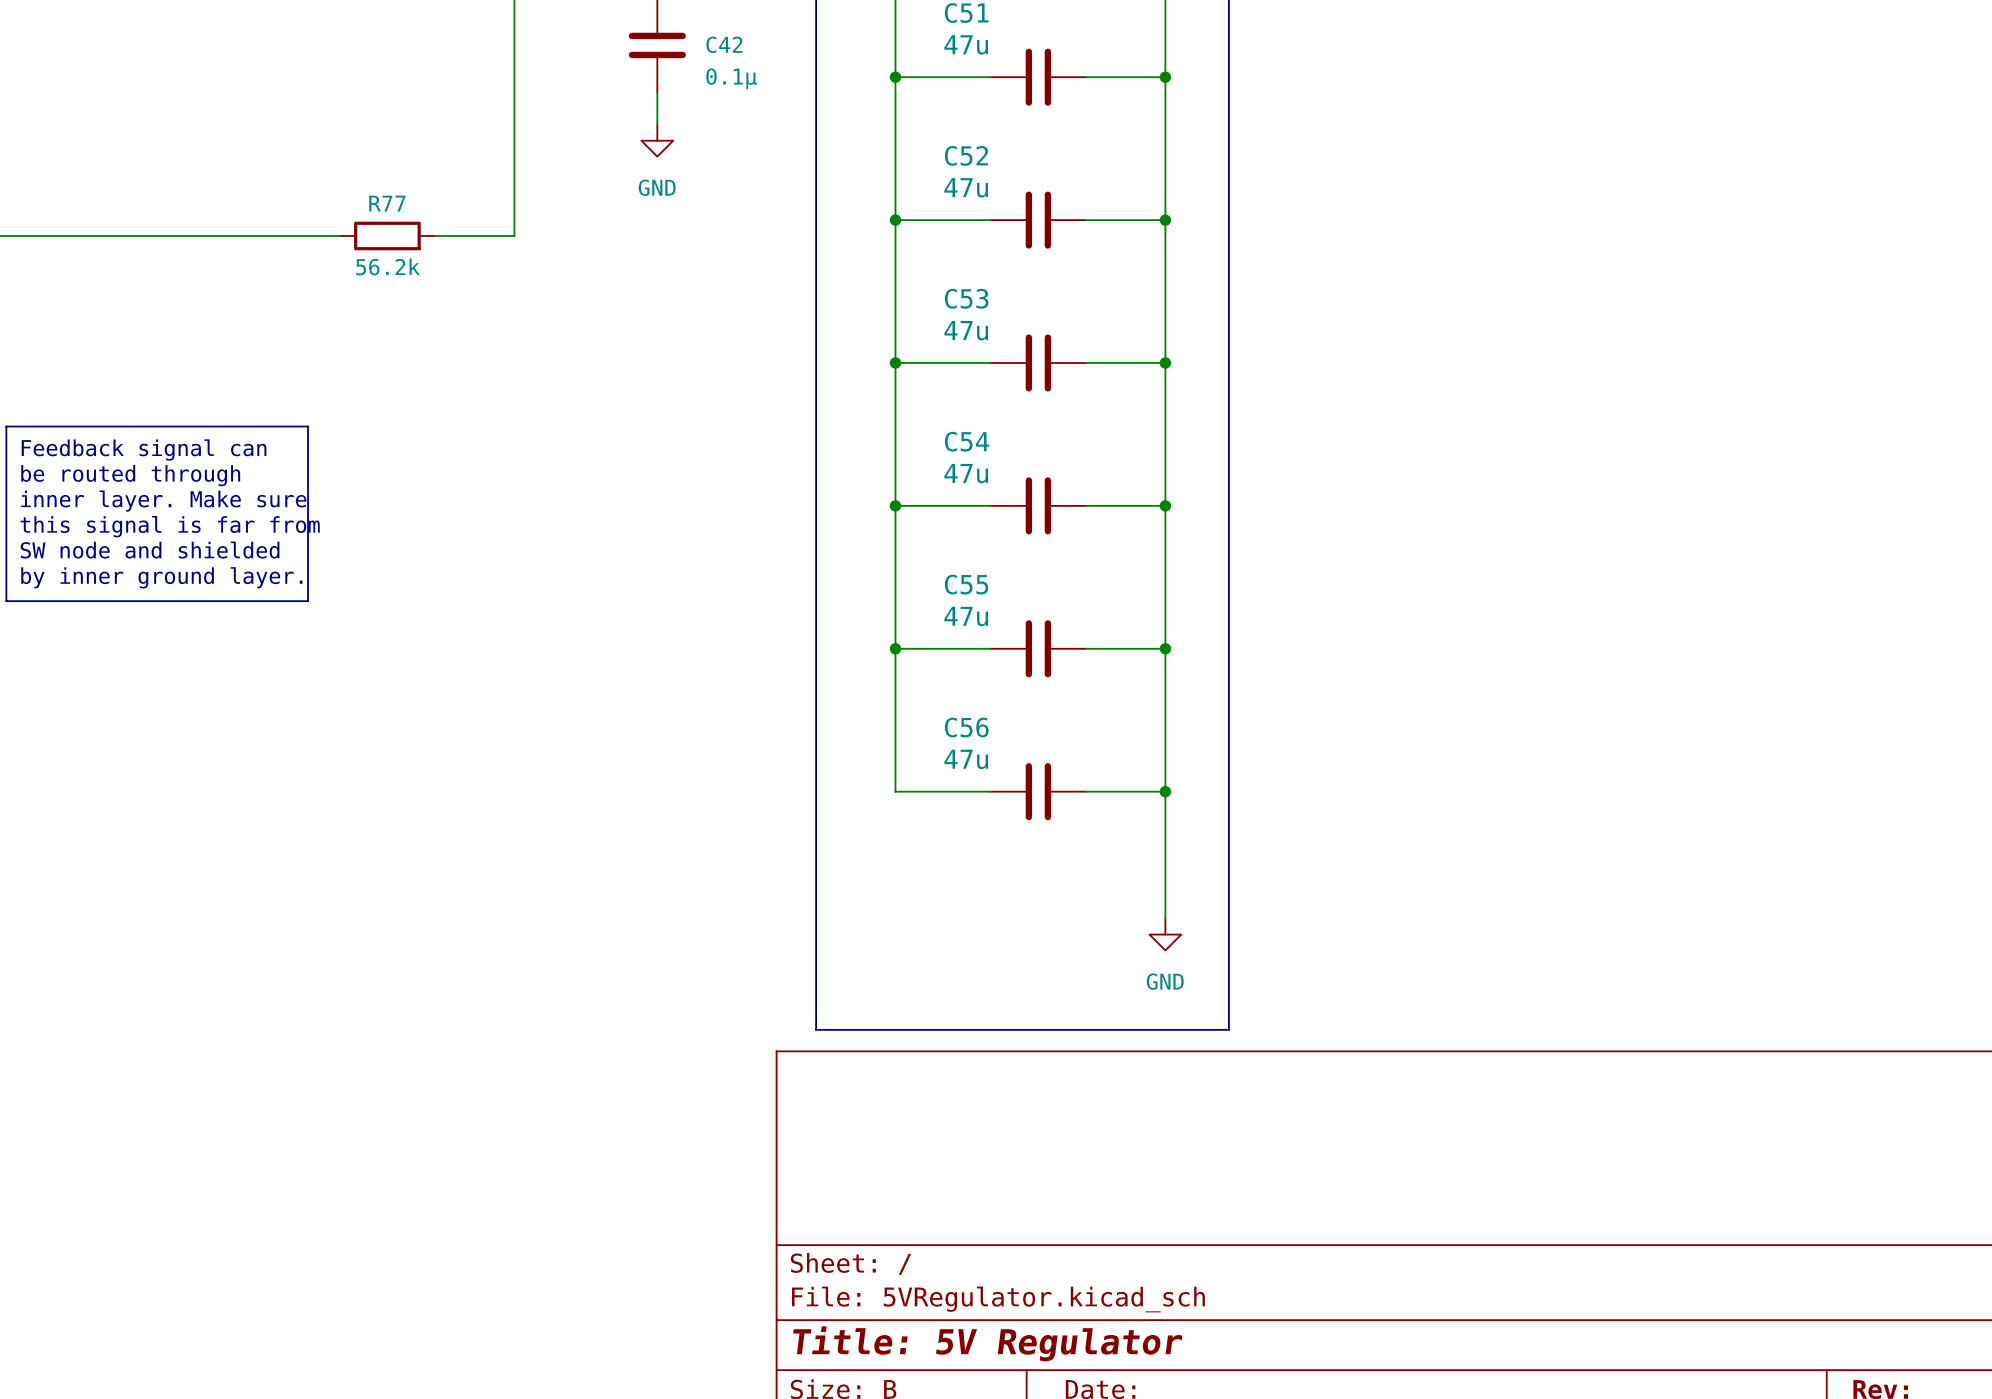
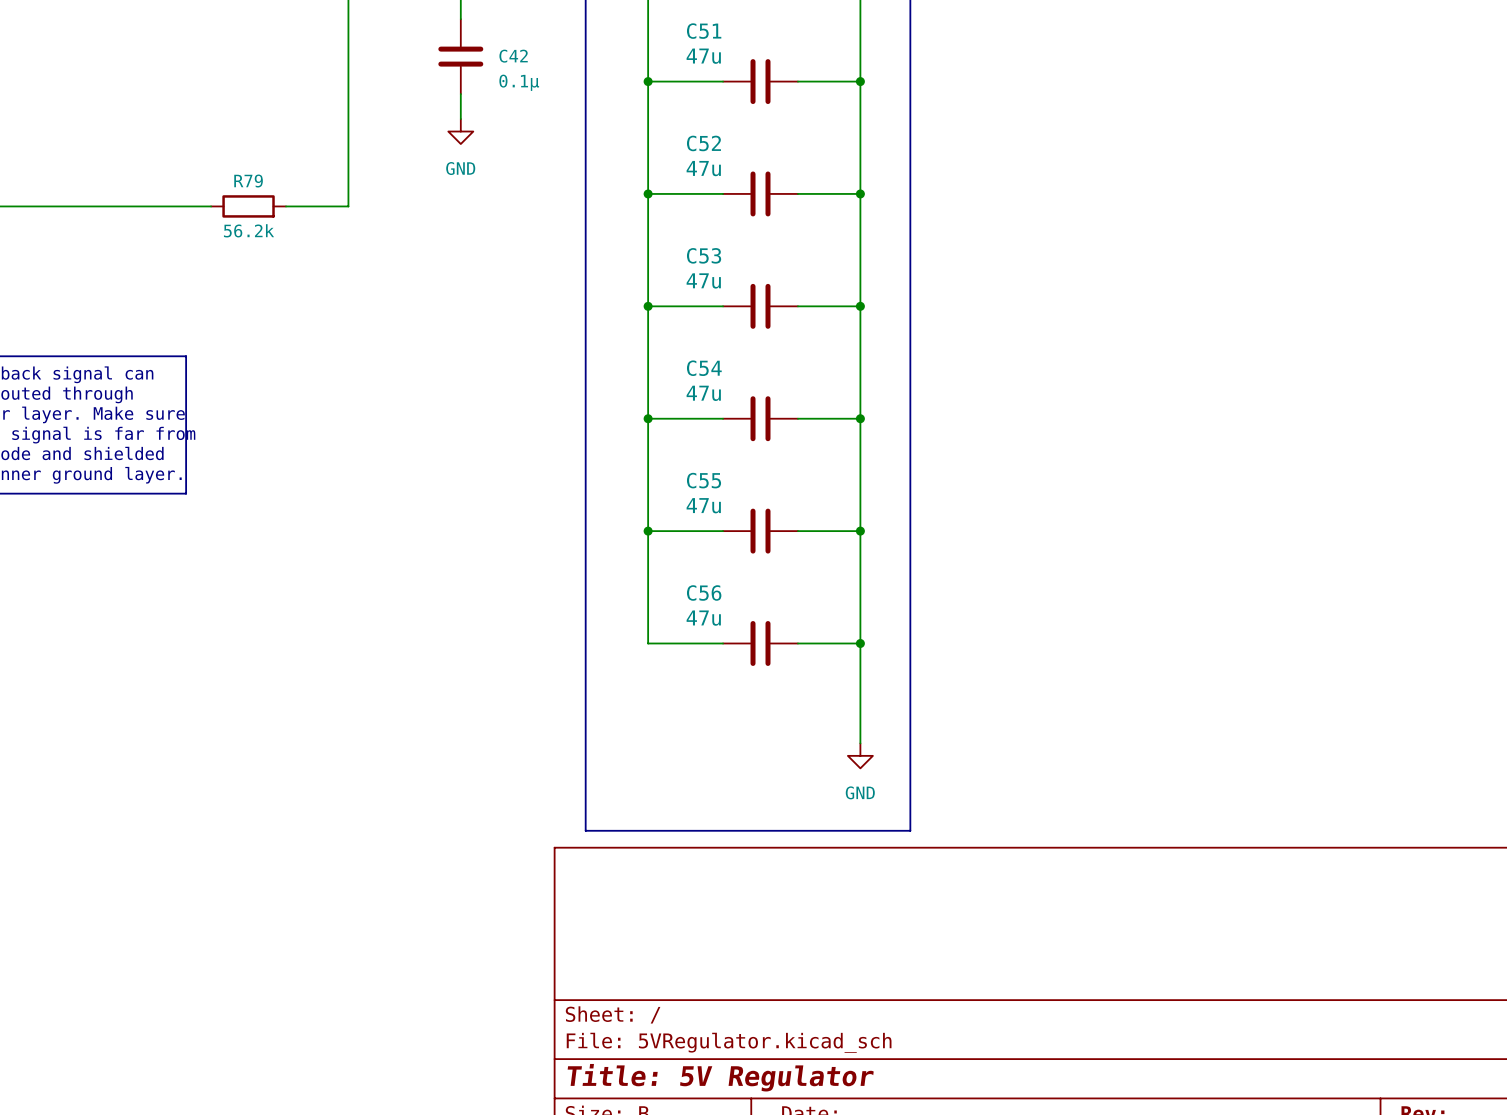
R77 name: R77 (387, 203) -> R79 (248, 181)

